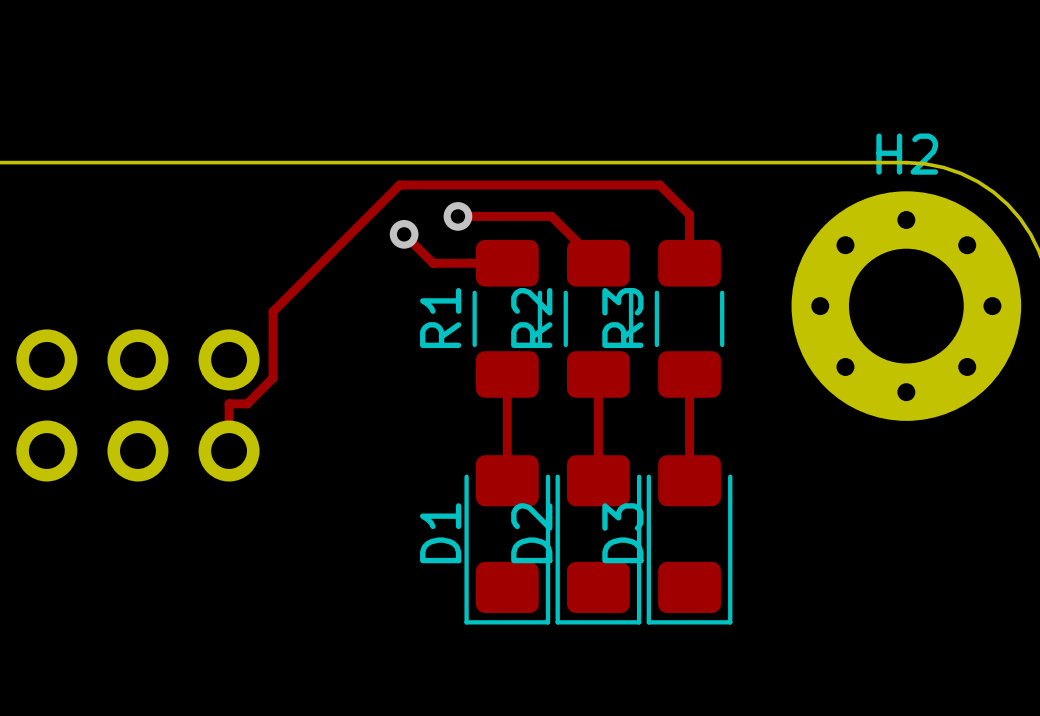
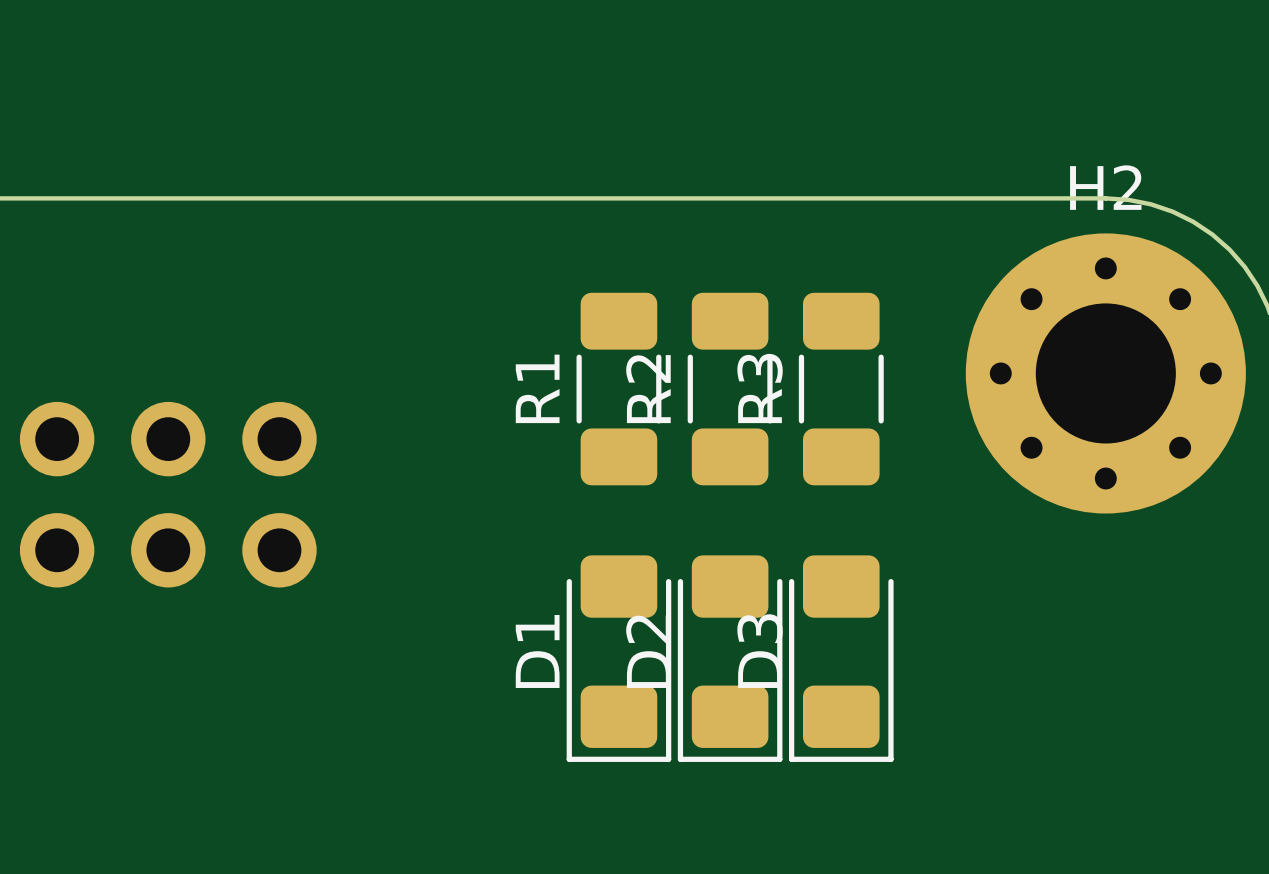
track: (457, 216) (551, 216) (598, 263) -> none
via: (457, 216) -> none
track: (404, 234) (433, 263) (507, 263) -> none
via: (404, 234) -> none
track: (689, 263) (689, 214) (659, 185) (399, 185) (273, 311) (273, 378) (247, 403) (229, 403) (229, 451) -> none
track: (507, 374) (507, 480) -> none
track: (598, 374) (598, 480) -> none
track: (689, 374) (689, 480) -> none

